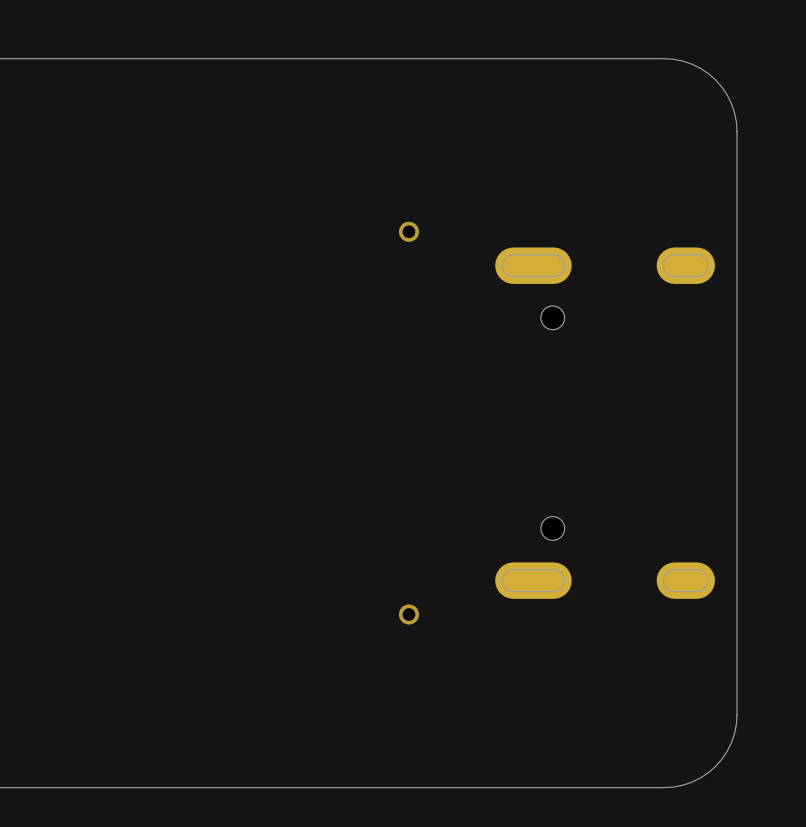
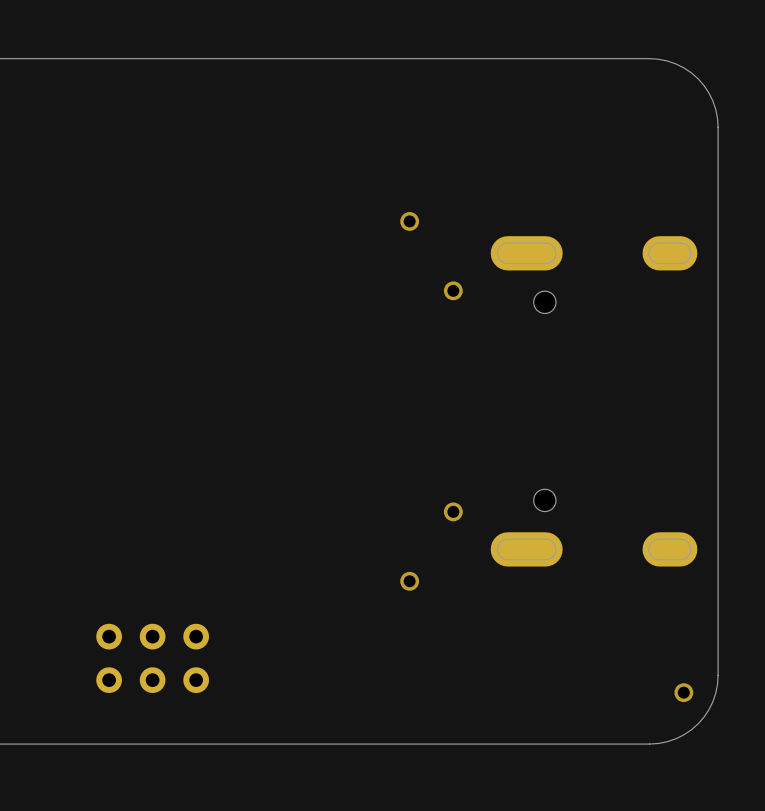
via: none -> (453, 290)
via: none -> (453, 511)
part: none -> (152, 658)
via: none -> (683, 692)

